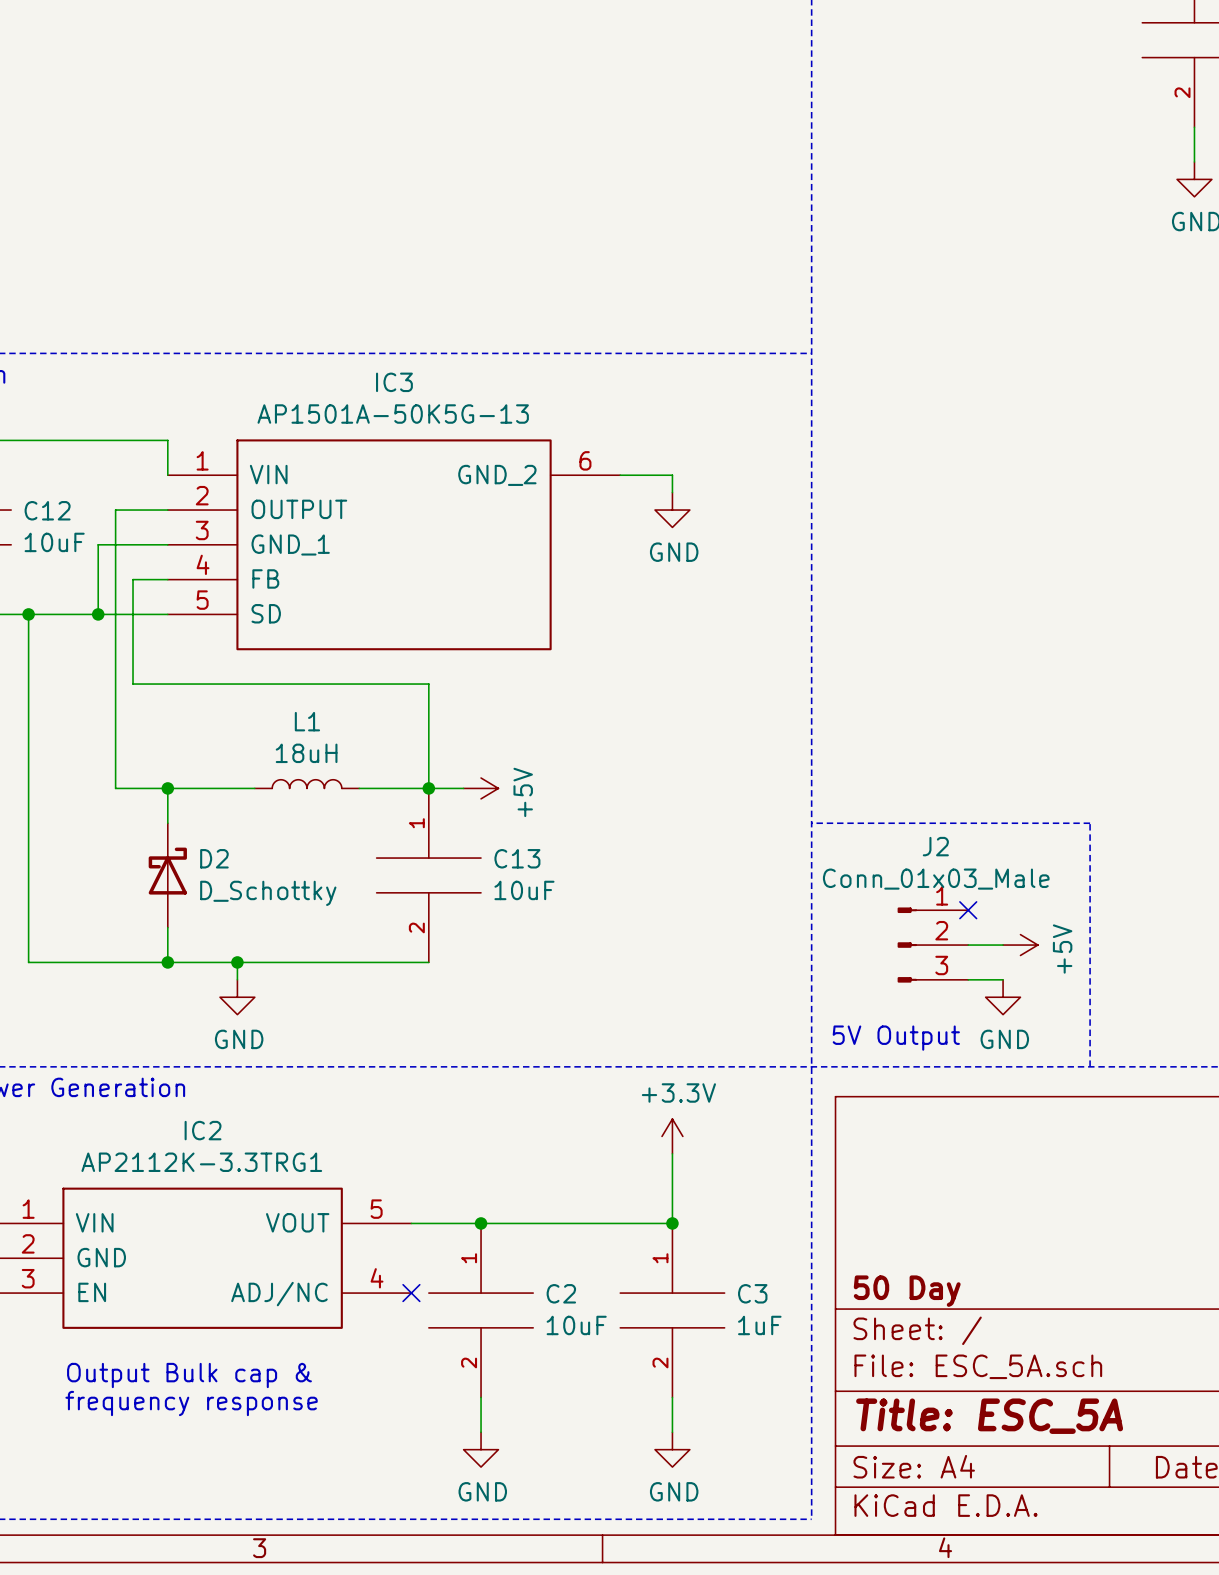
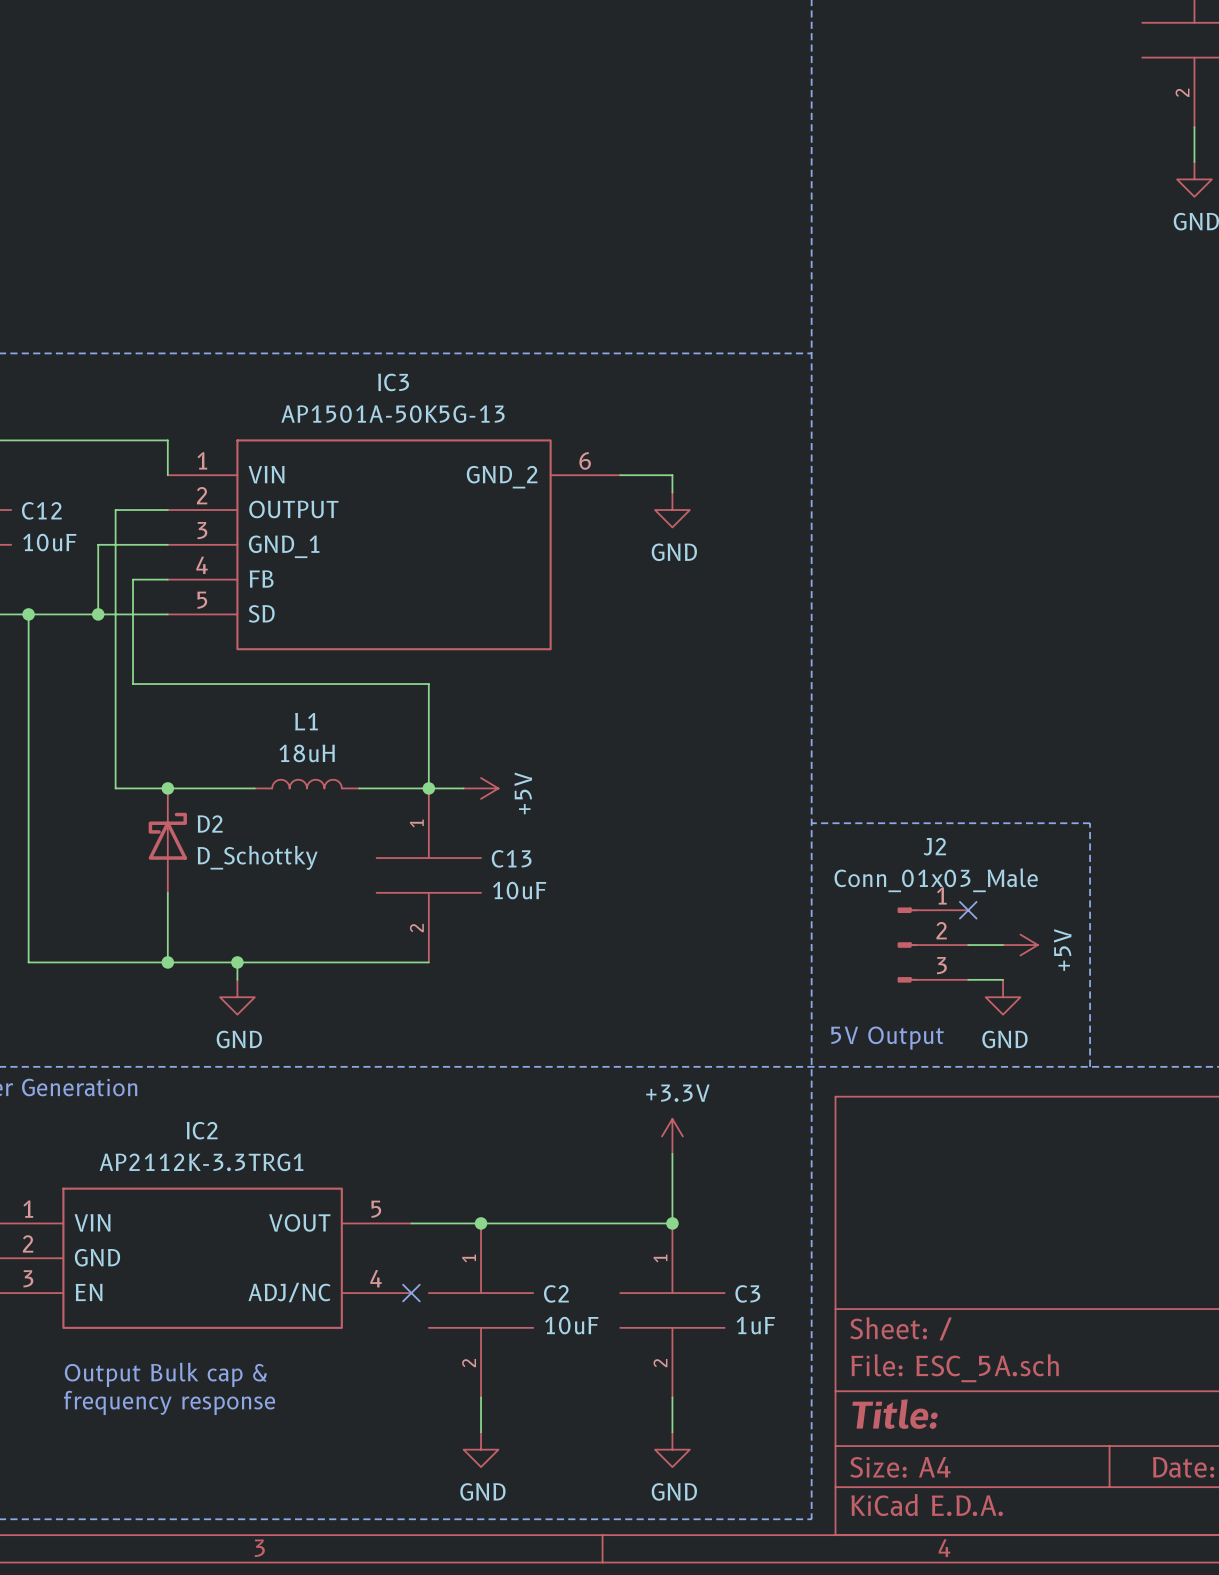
D2 position: (167, 875) -> (167, 840)
title block: 50 Day (907, 1291) -> none
title block: Title: ESC_5A (989, 1416) -> Title: (895, 1414)

